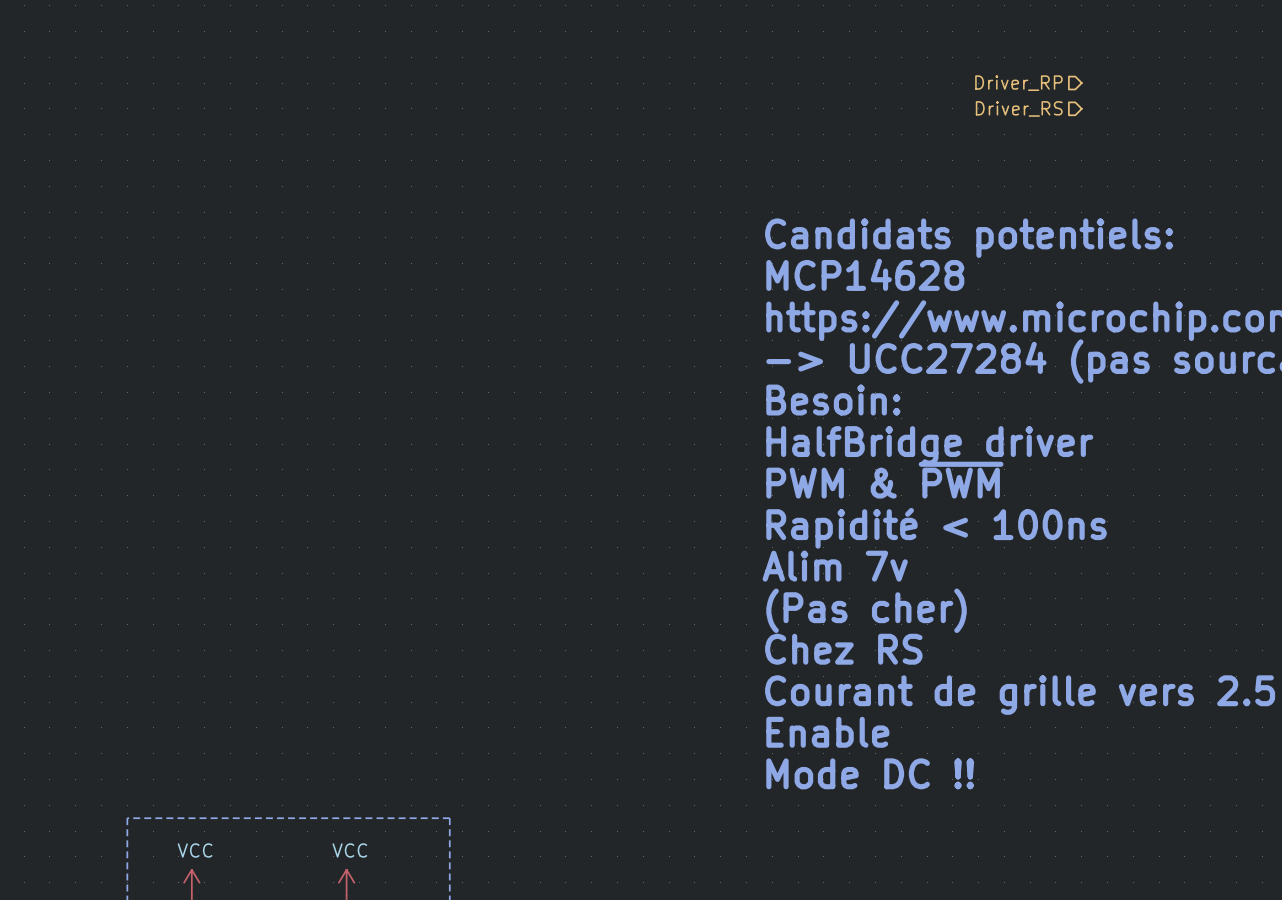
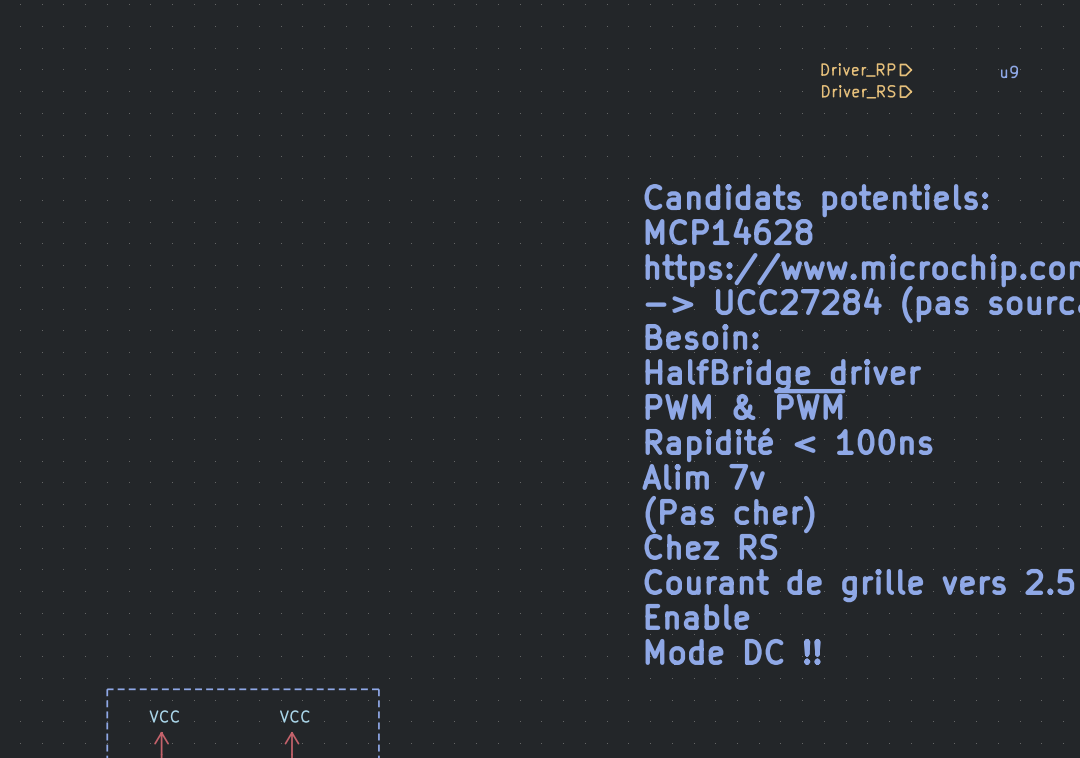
text: none -> u9 (1009, 71)

